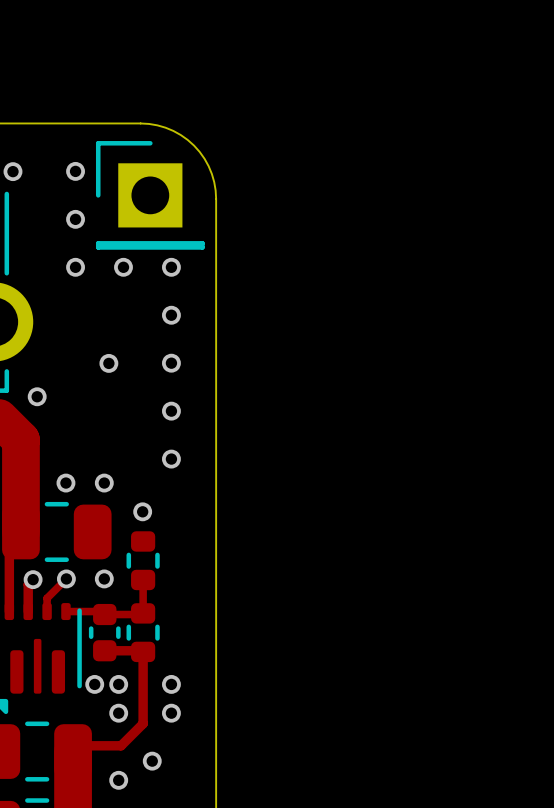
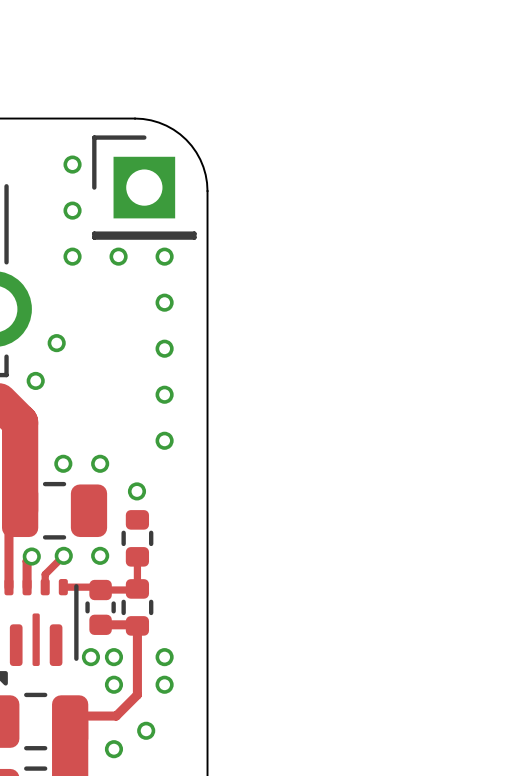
via: (12, 171) -> none
via position: (108, 363) -> (56, 343)

